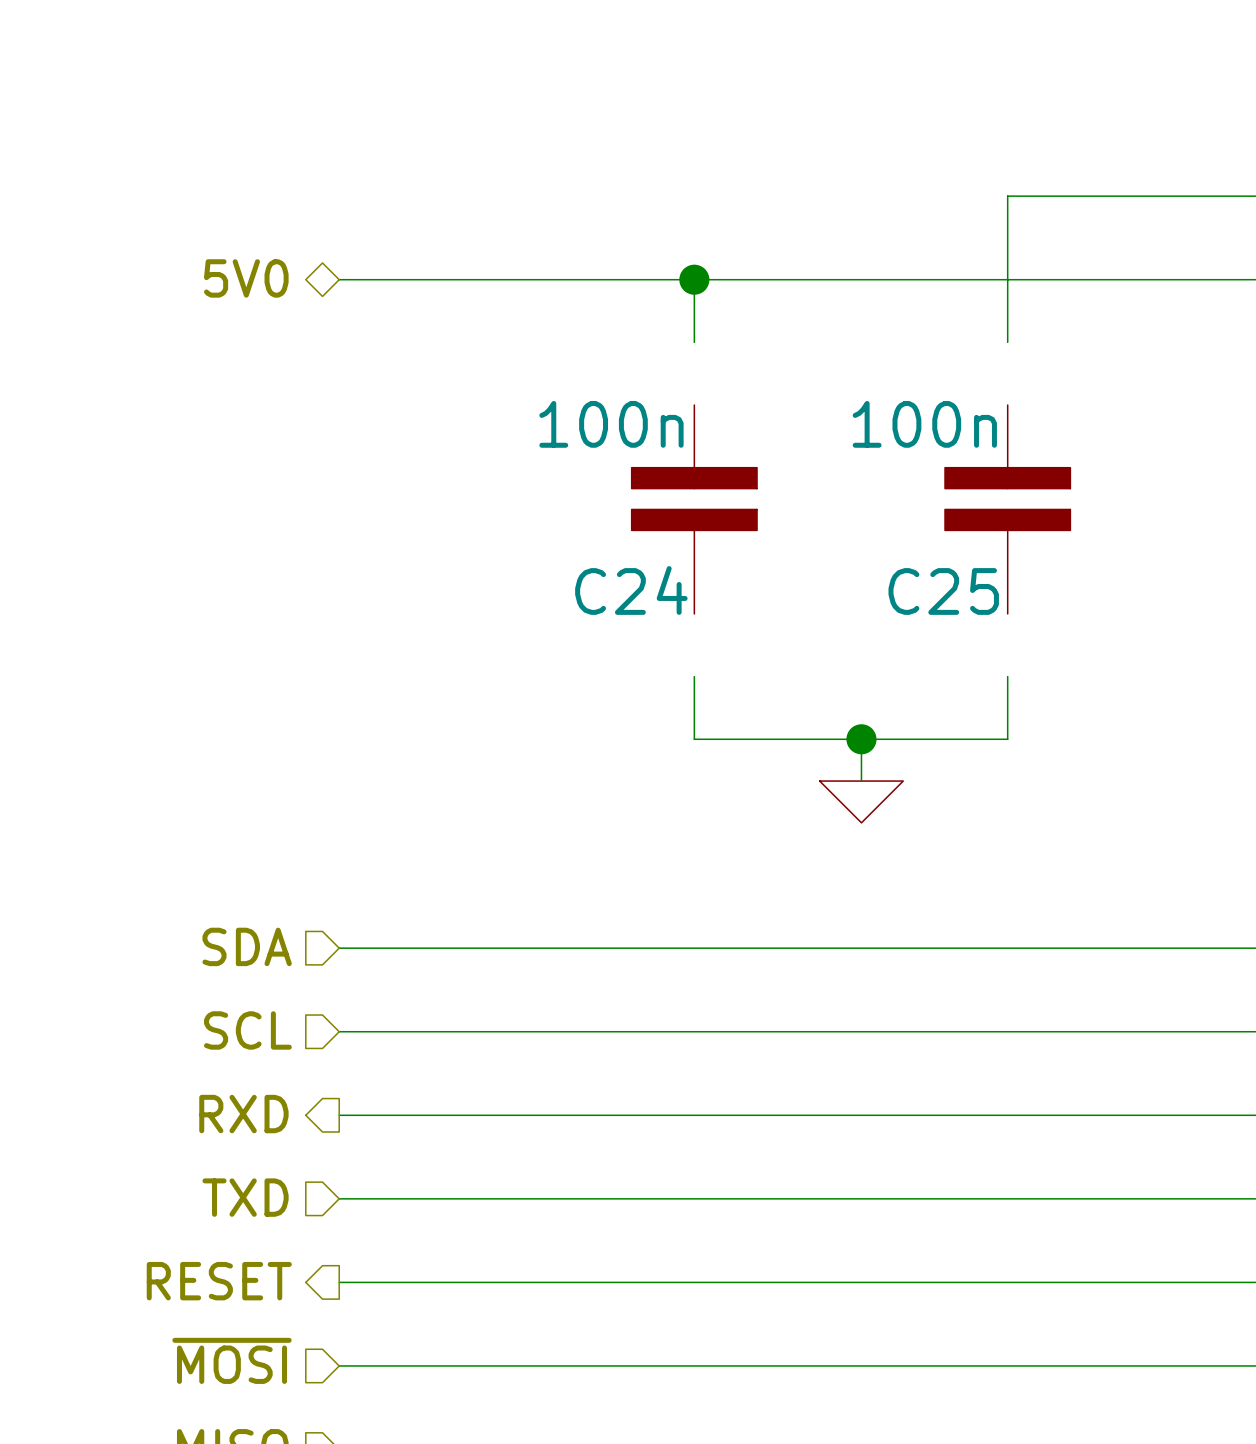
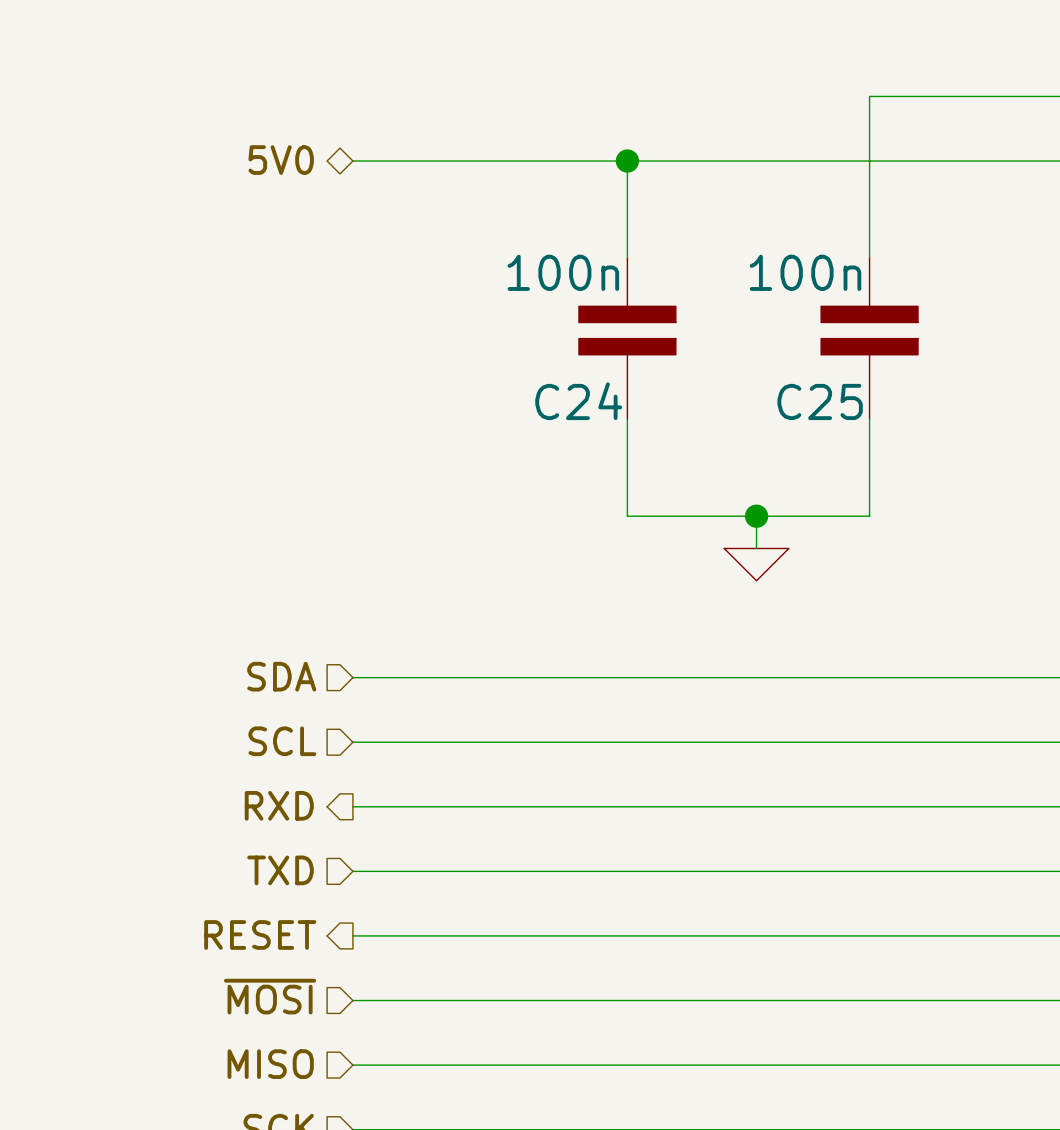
wire: none -> (627, 209) (627, 257)
wire: none -> (869, 209) (869, 257)
wire: none -> (627, 419) (627, 467)
wire: none -> (869, 419) (869, 467)

